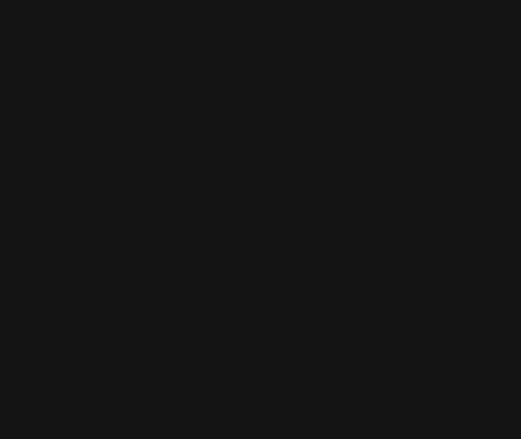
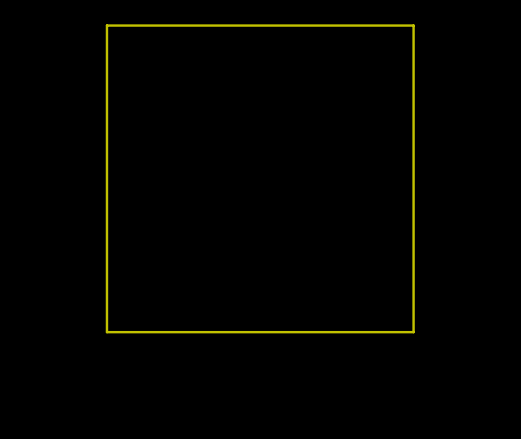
board edge: none -> (413, 25) (106, 25) (106, 332) (413, 332) (413, 25)

